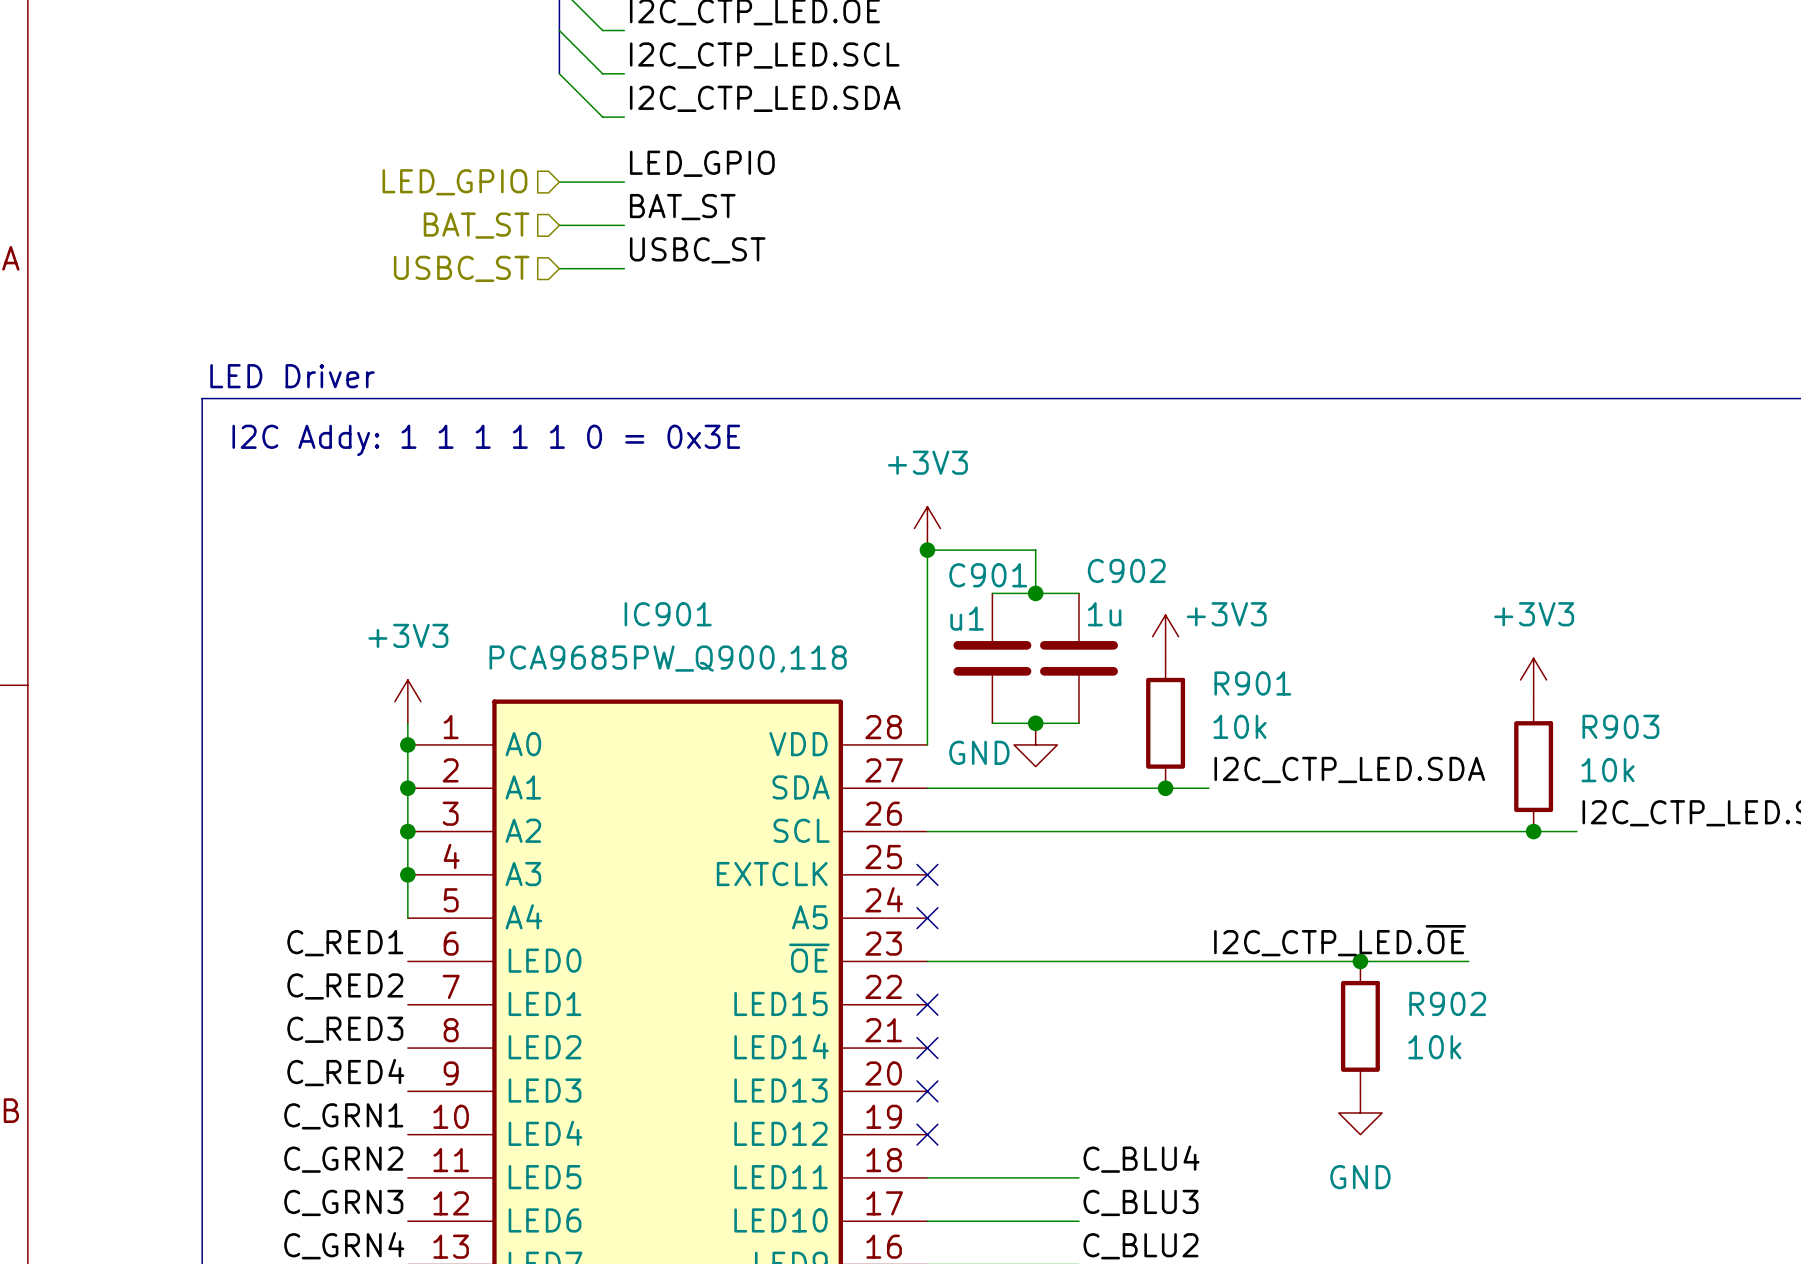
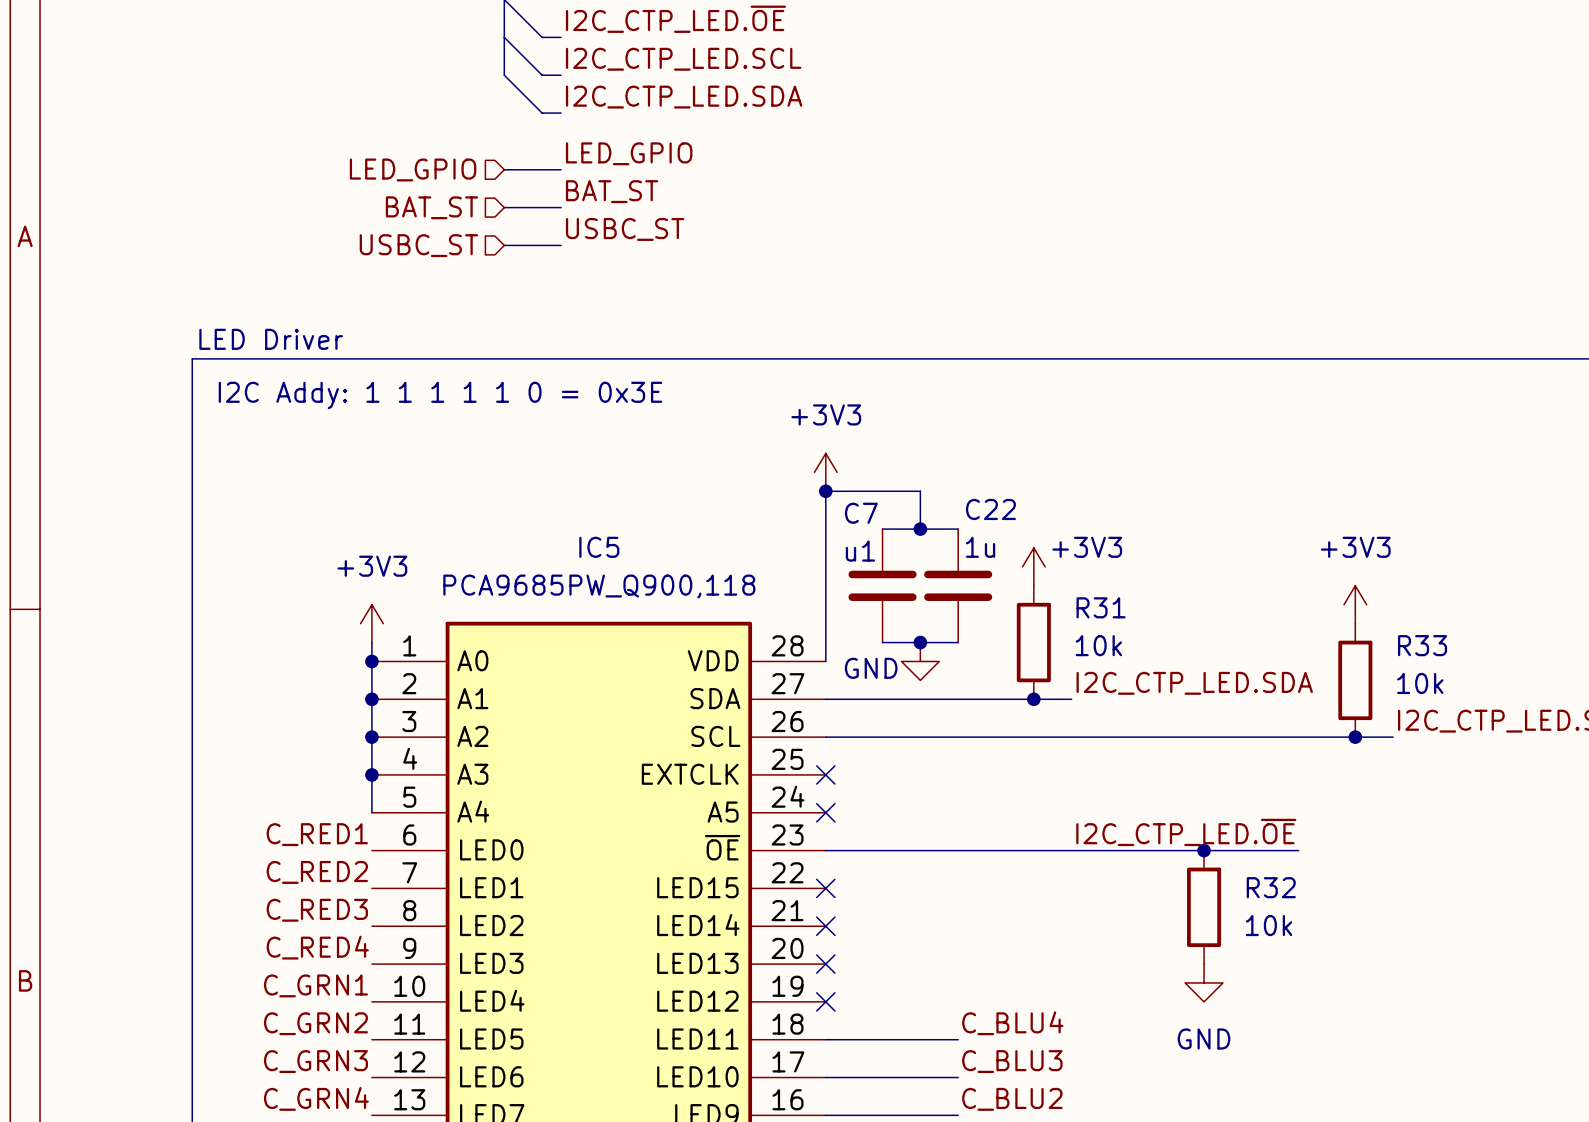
C902 name: C902 (1126, 570) -> C22 (990, 509)
C901 name: C901 (988, 575) -> C7 (861, 513)
IC901 name: IC901 (668, 614) -> IC5 (599, 547)
R901 name: R901 (1252, 683) -> R31 (1101, 607)
R903 name: R903 (1620, 726) -> R33 (1422, 645)
R902 name: R902 (1447, 1003) -> R32 (1271, 887)

